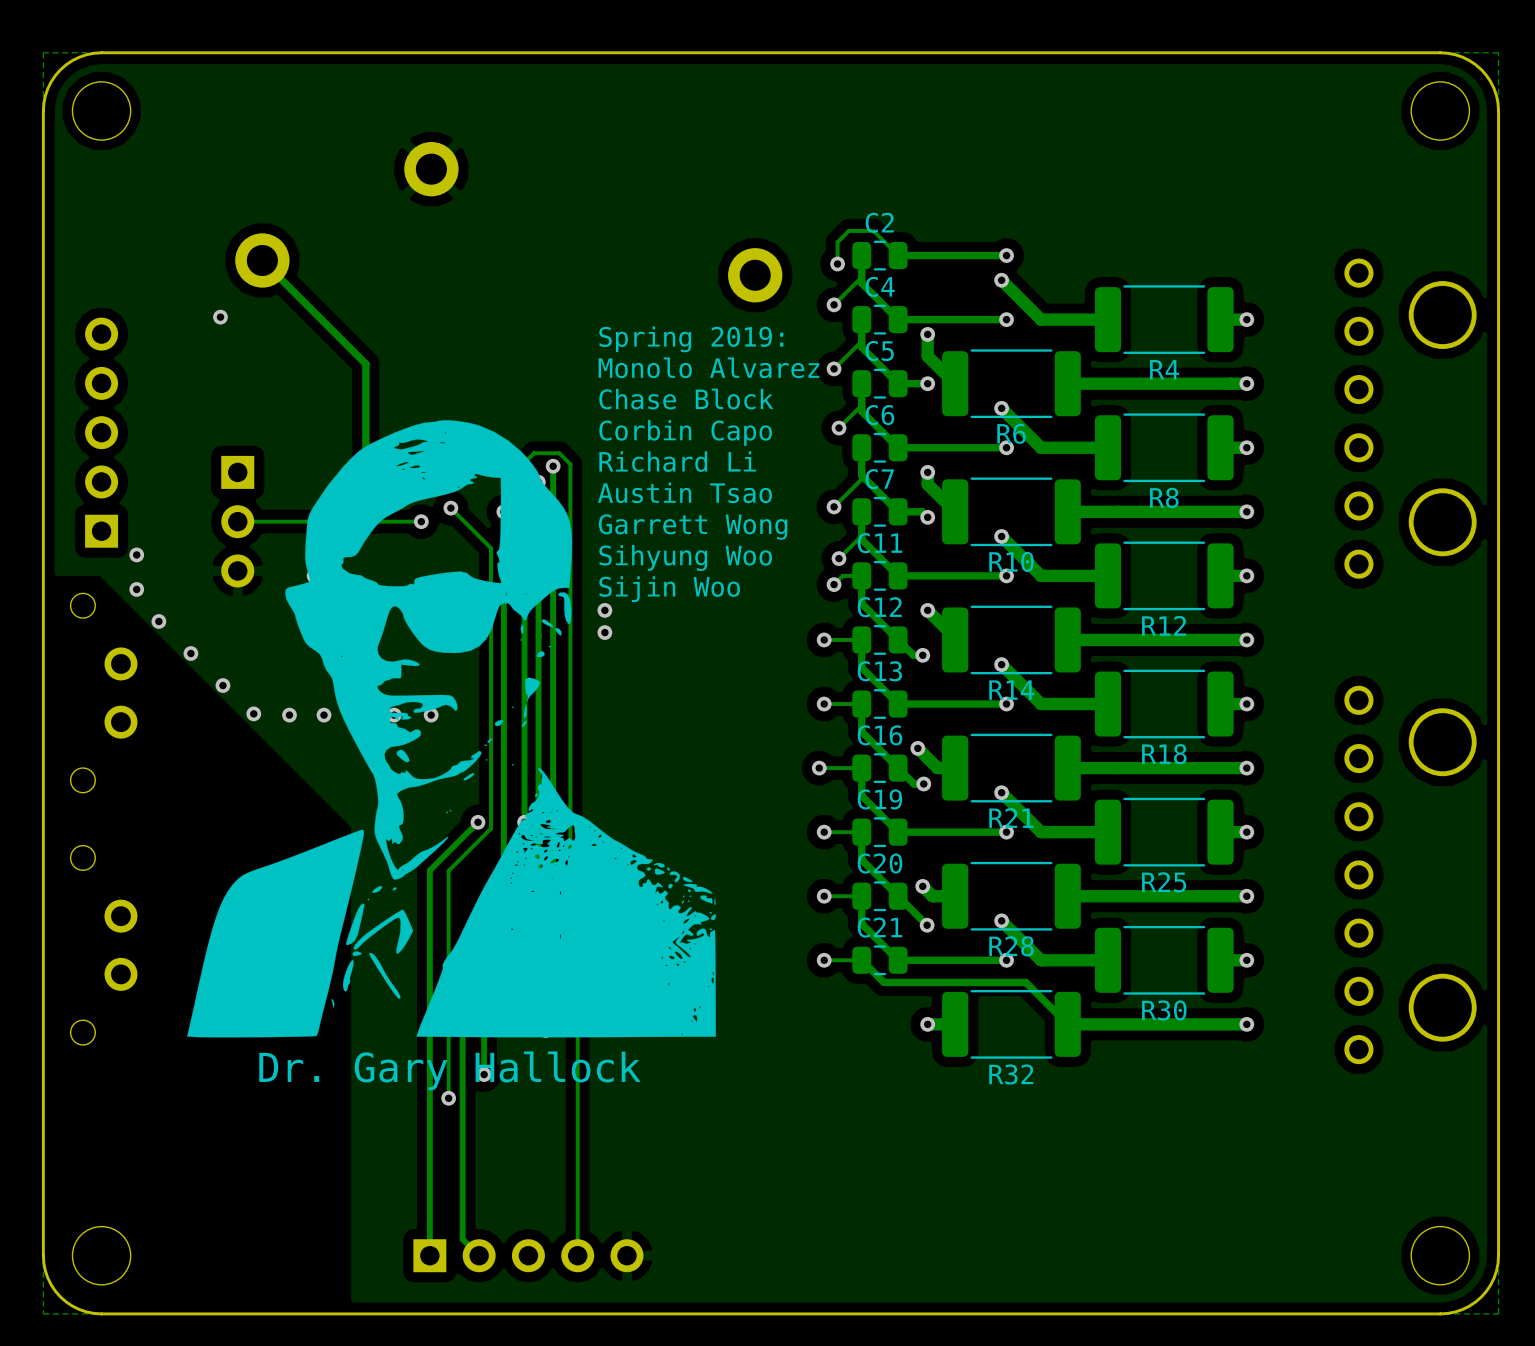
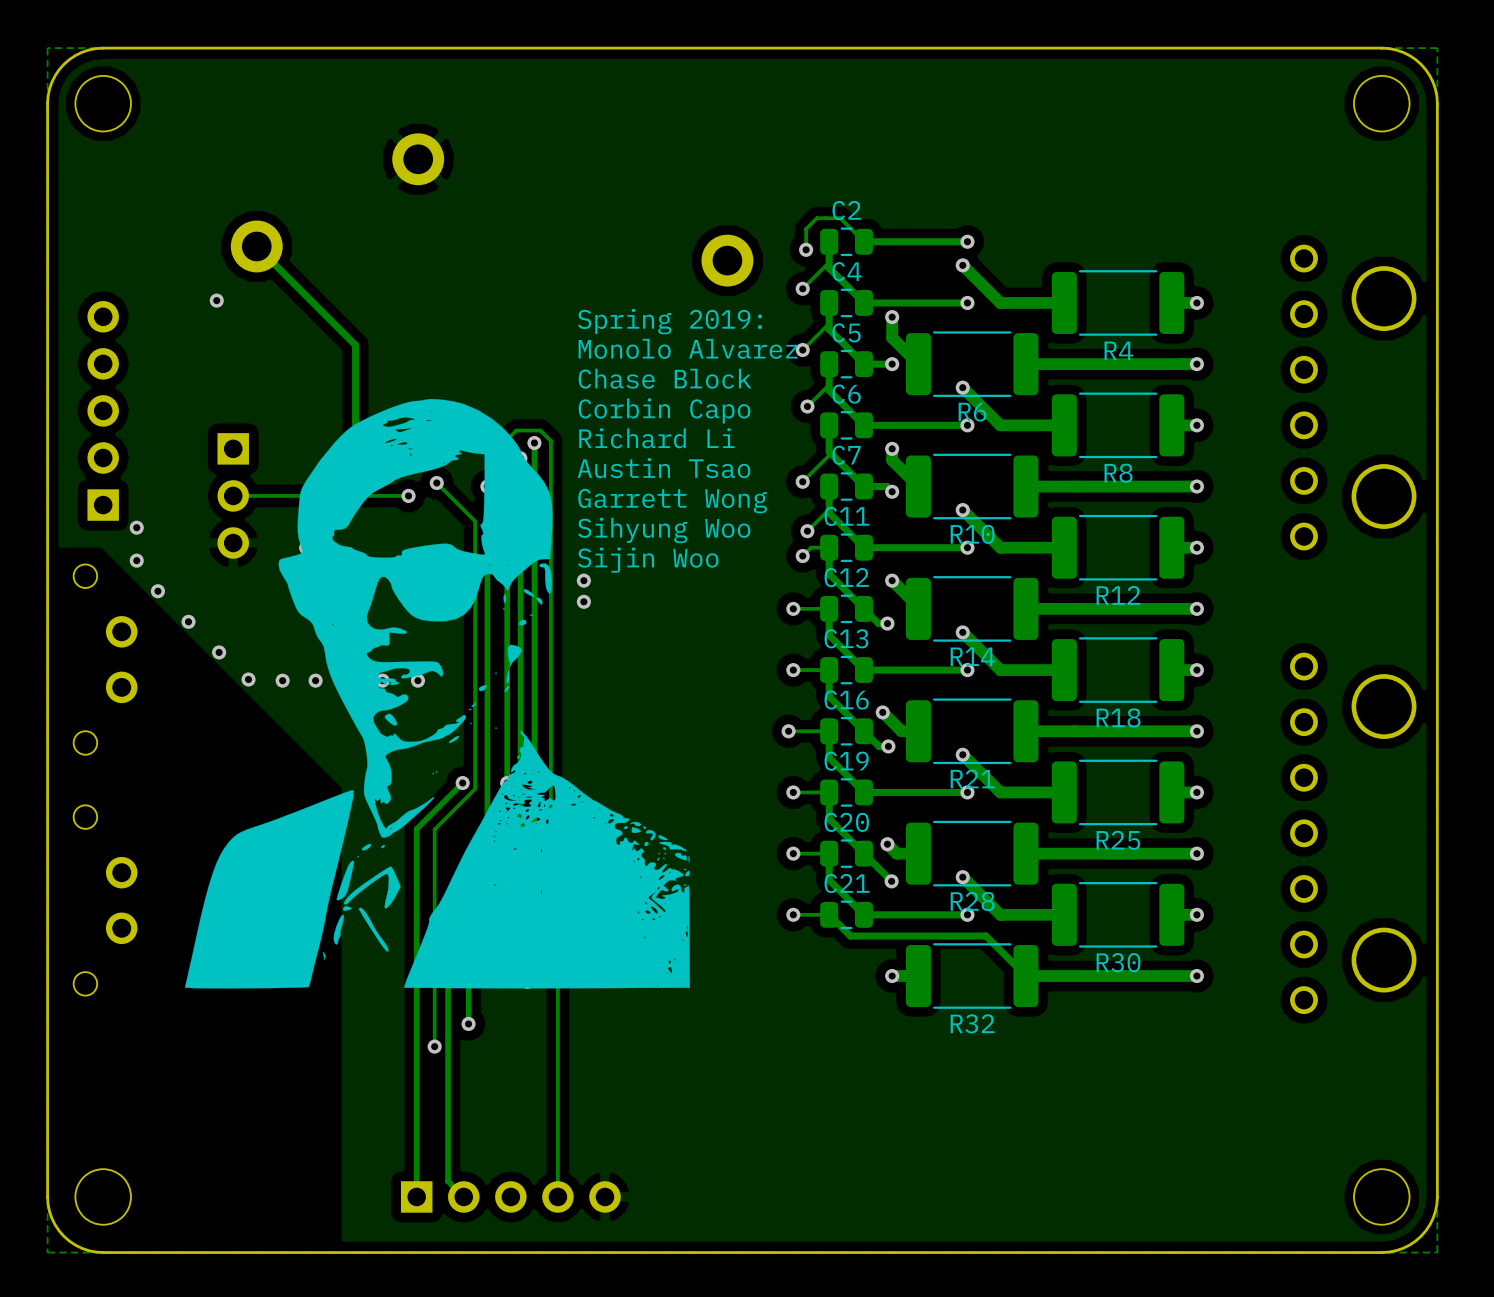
text: Dr. Gary Hallock (449, 1070) -> none

